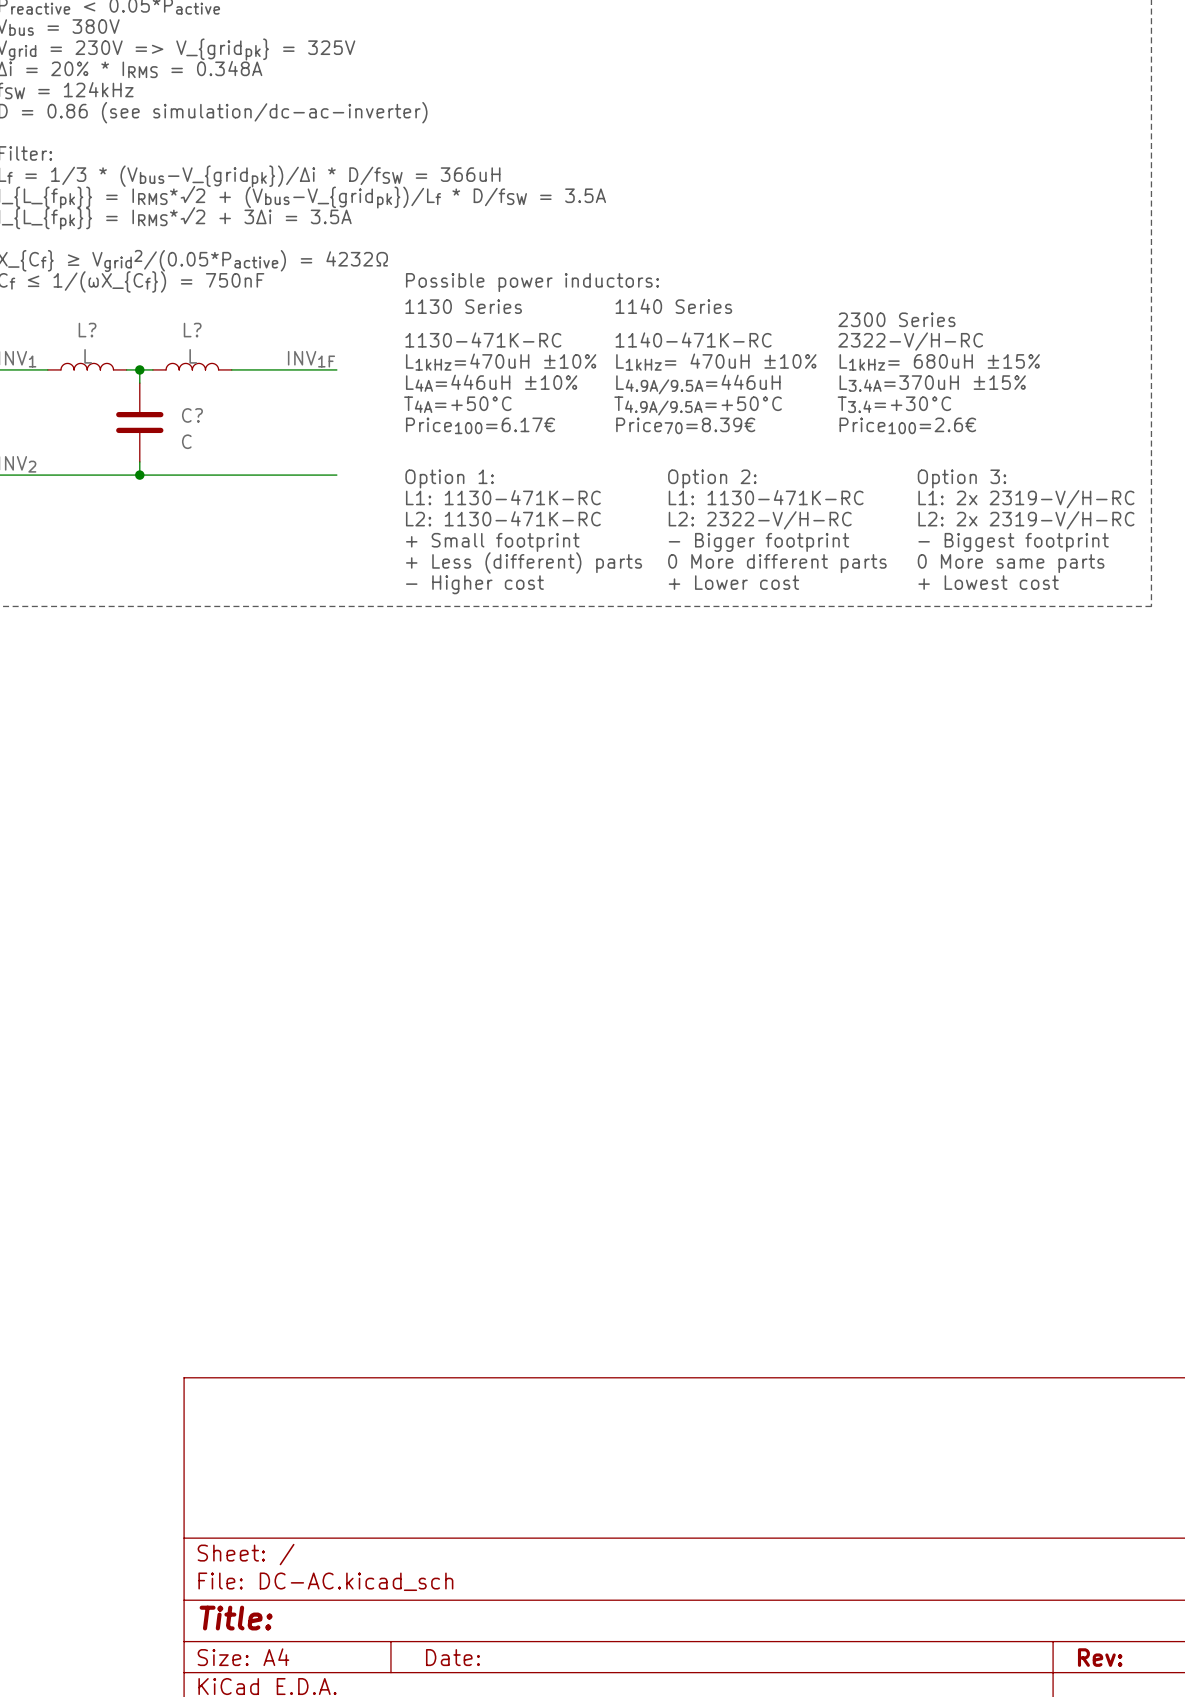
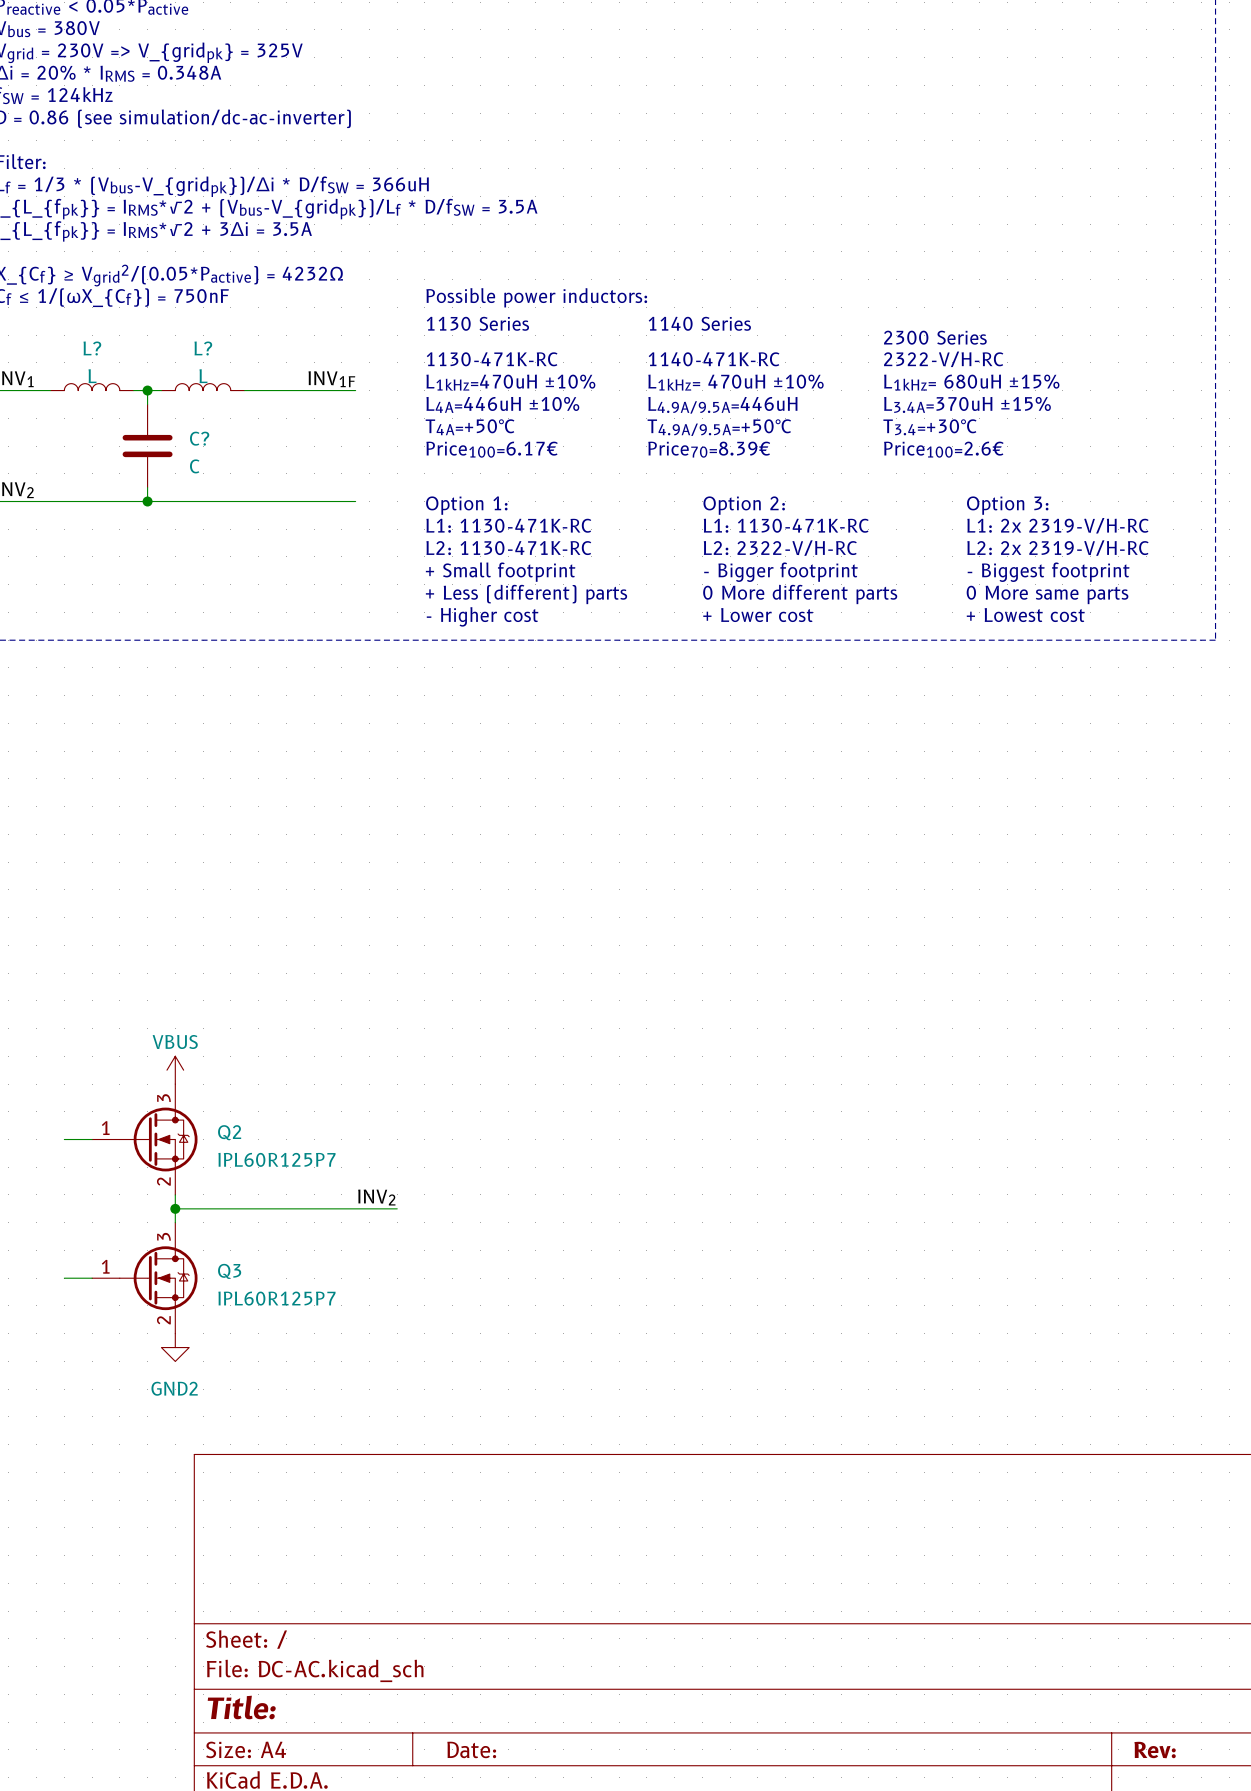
power symbol: none -> VBUS (175, 1070)
wire: none -> (64, 1139) (92, 1139)
Q2: none -> IPL60R125P7 (144, 1139)
wire: none -> (175, 1194) (175, 1222)
label: none -> INV2 (376, 1197)
wire: none -> (175, 1208) (397, 1208)
junction: none -> (175, 1208)
wire: none -> (64, 1278) (92, 1278)
Q3: none -> IPL60R125P7 (144, 1278)
power symbol: none -> GND2 (175, 1347)

